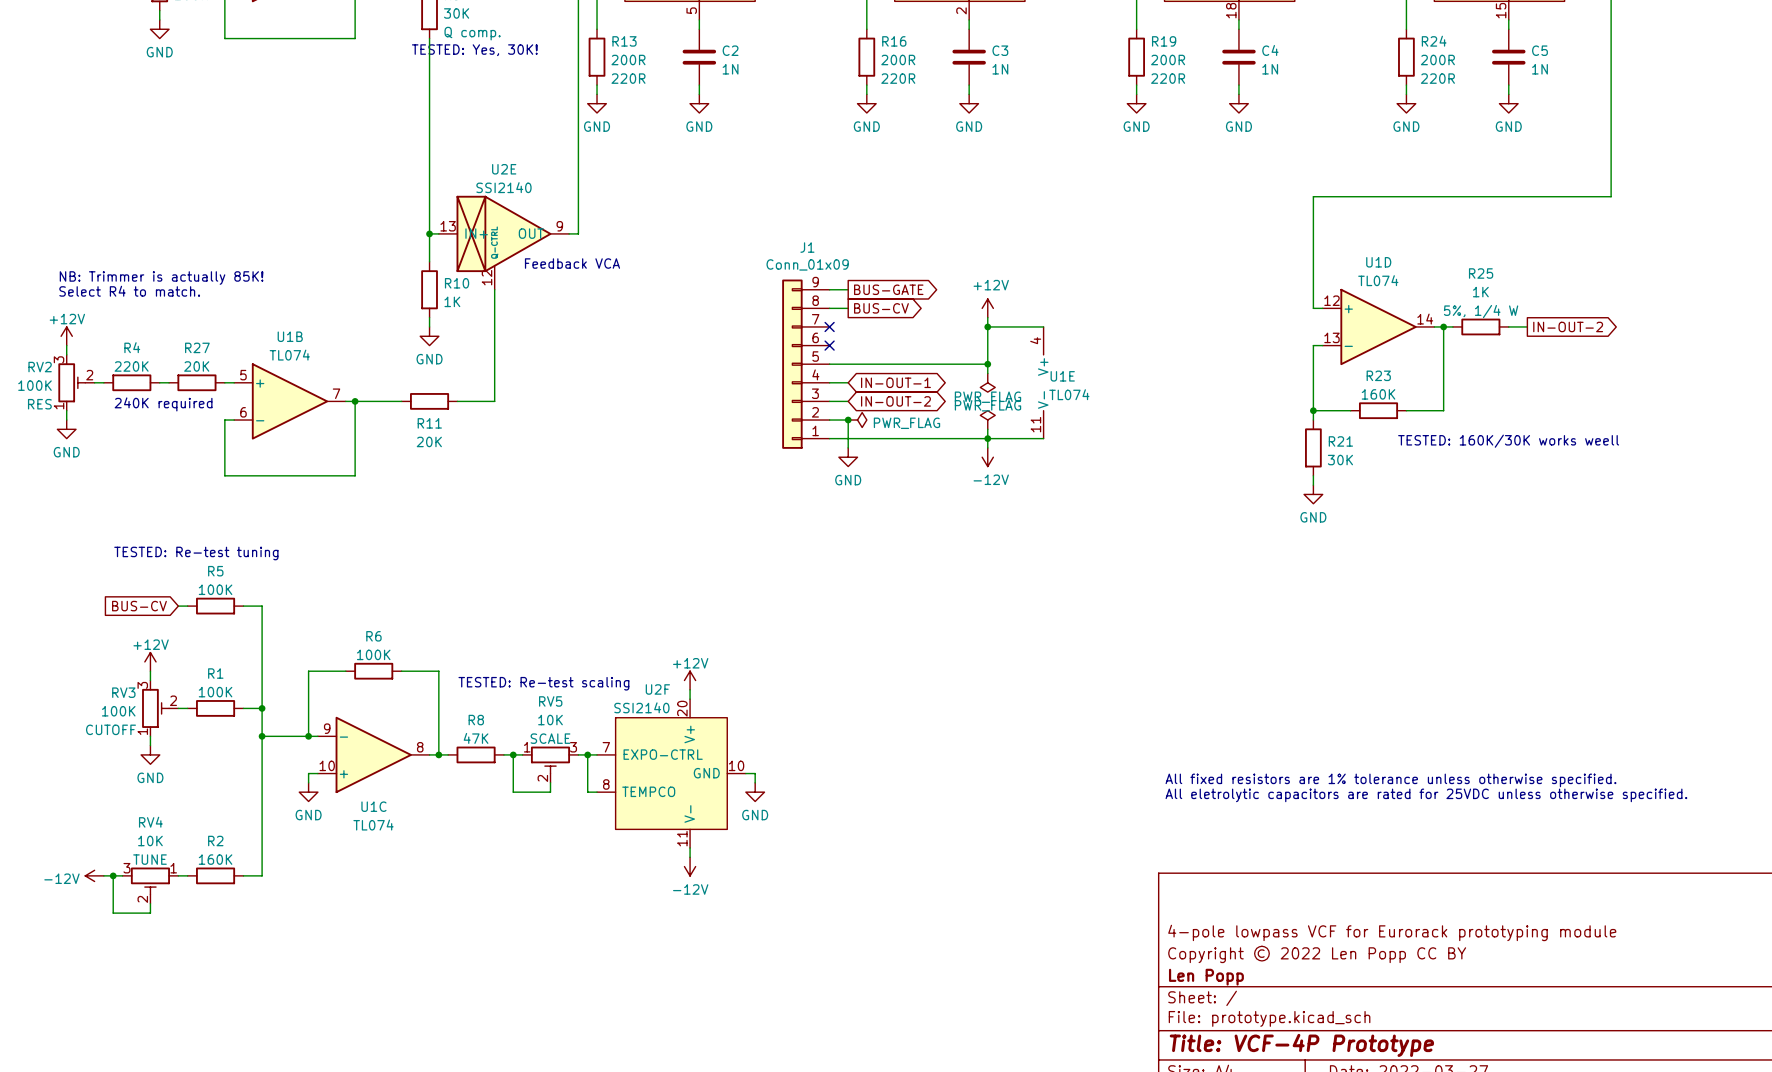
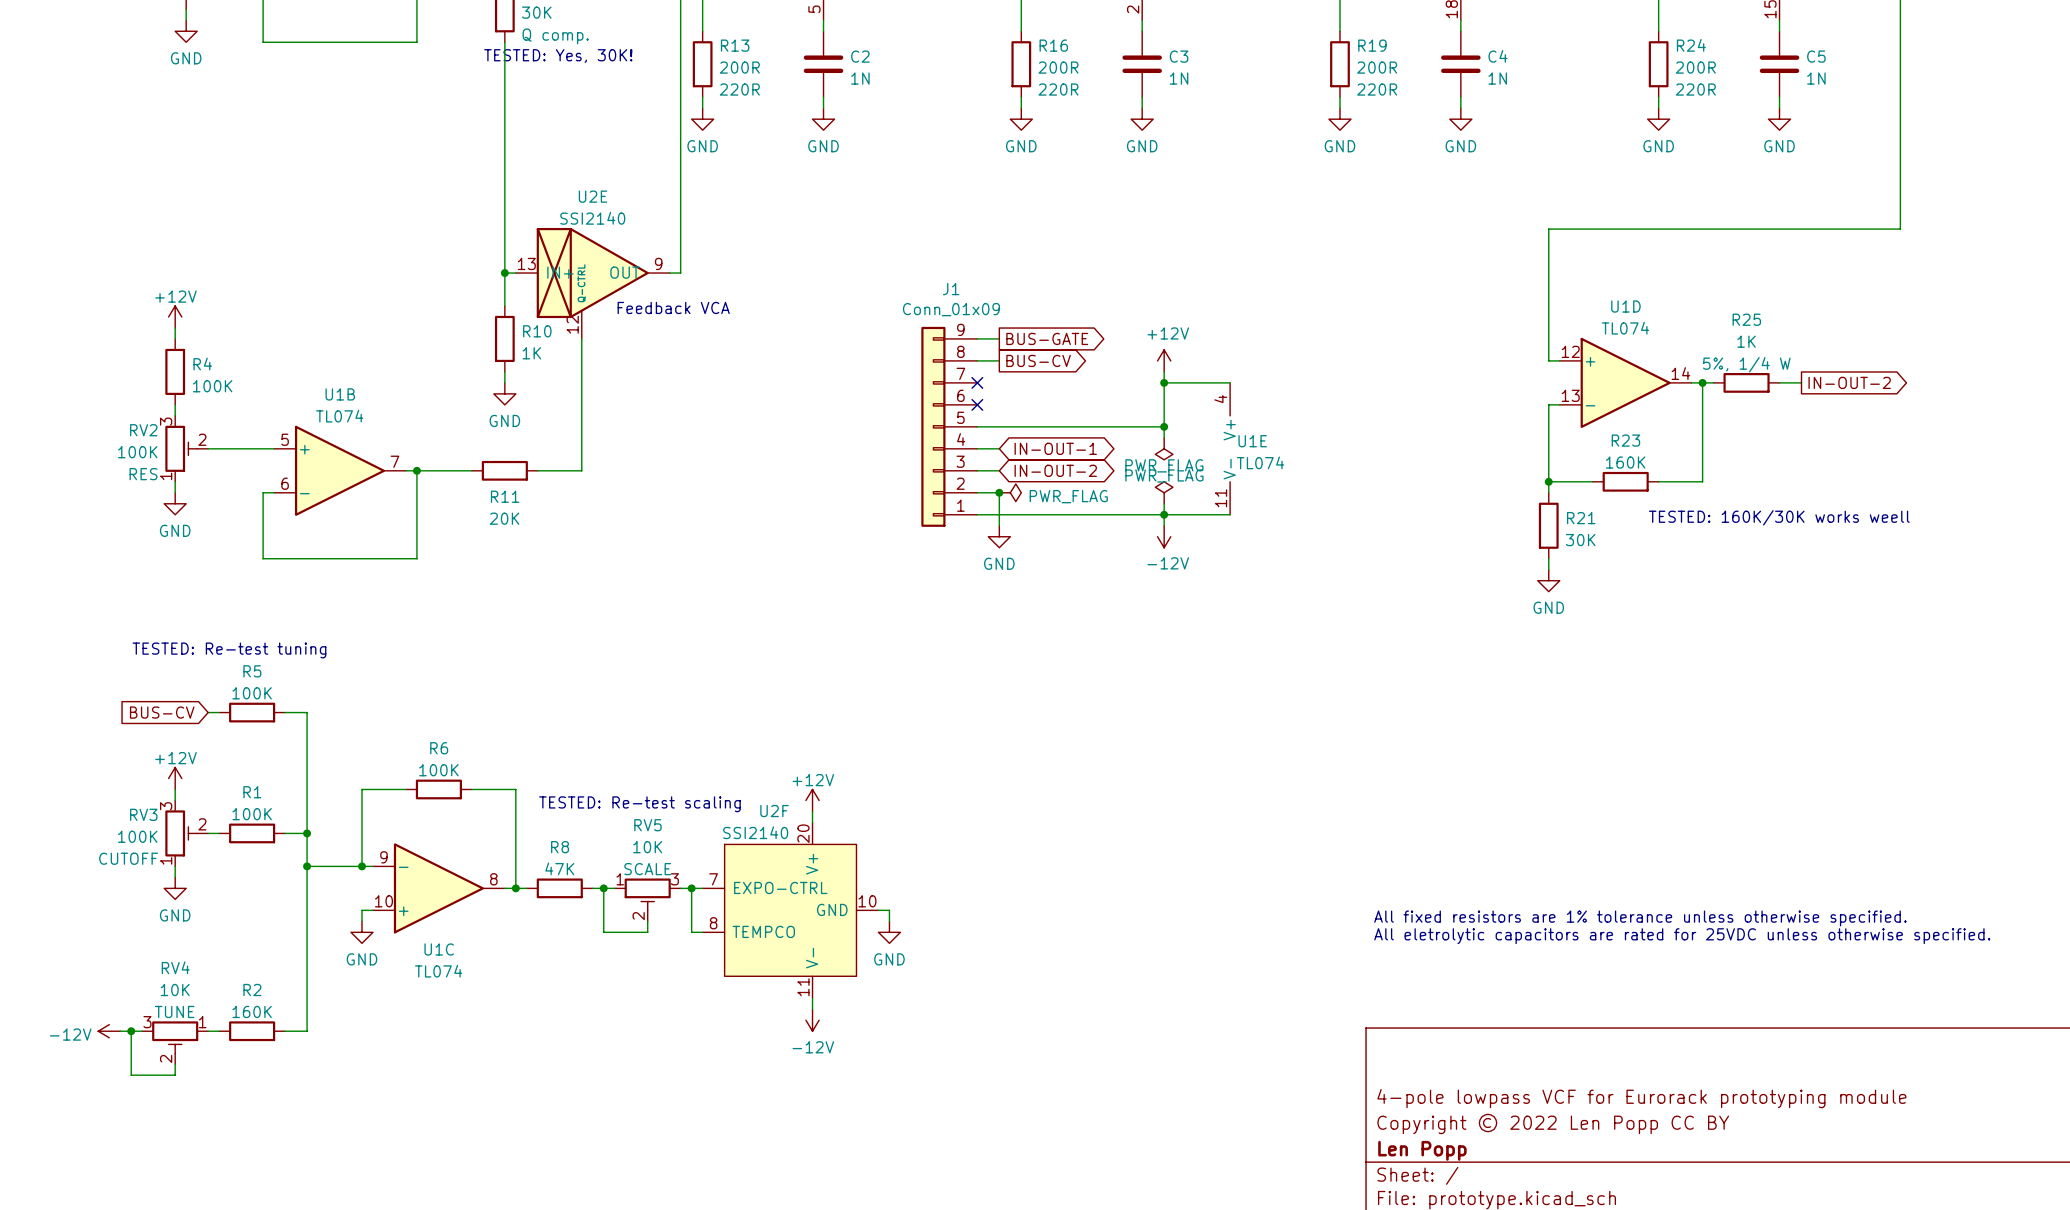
text: NB: Trimmer is actually 85K! (161, 278) -> none
wire: none -> (175, 327) (175, 338)
text: Select R4 to match. (129, 291) -> none
power symbol position: +12V (66, 336) -> +12V (175, 316)
wire: (66, 345) (66, 354) -> (175, 404) (175, 415)
R4 value: 220K (131, 366) -> 100K (212, 386)
RV2 position: (76, 382) -> (186, 448)
wire: (94, 382) (103, 382) -> none
R4 rotation: 0° (131, 382) -> 90° clockwise (175, 371)
R4 position: (131, 382) -> (175, 371)
wire: none -> (208, 448) (263, 448)
R27: 20K (196, 382) -> none
text: 240K required (163, 404) -> none
wire: (66, 410) (66, 420) -> (175, 481) (175, 492)
power symbol position: GND (66, 429) -> GND (175, 503)

